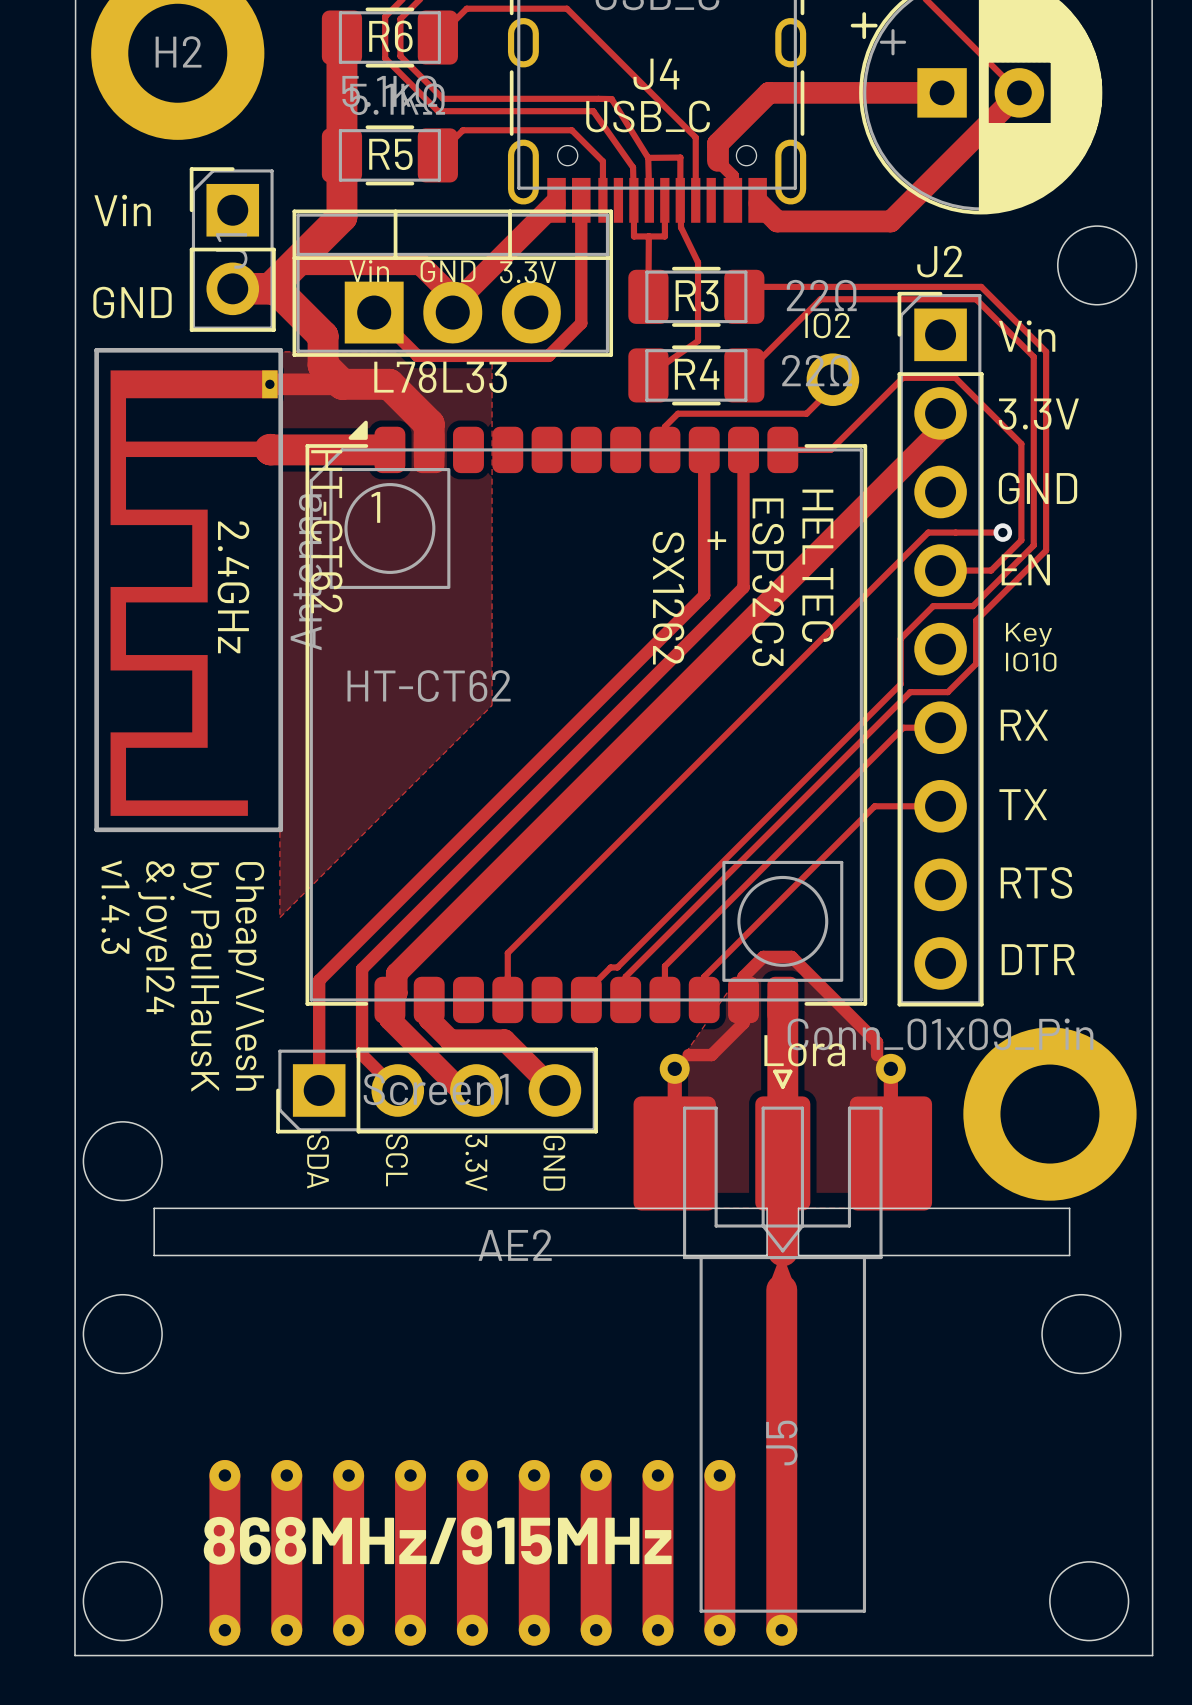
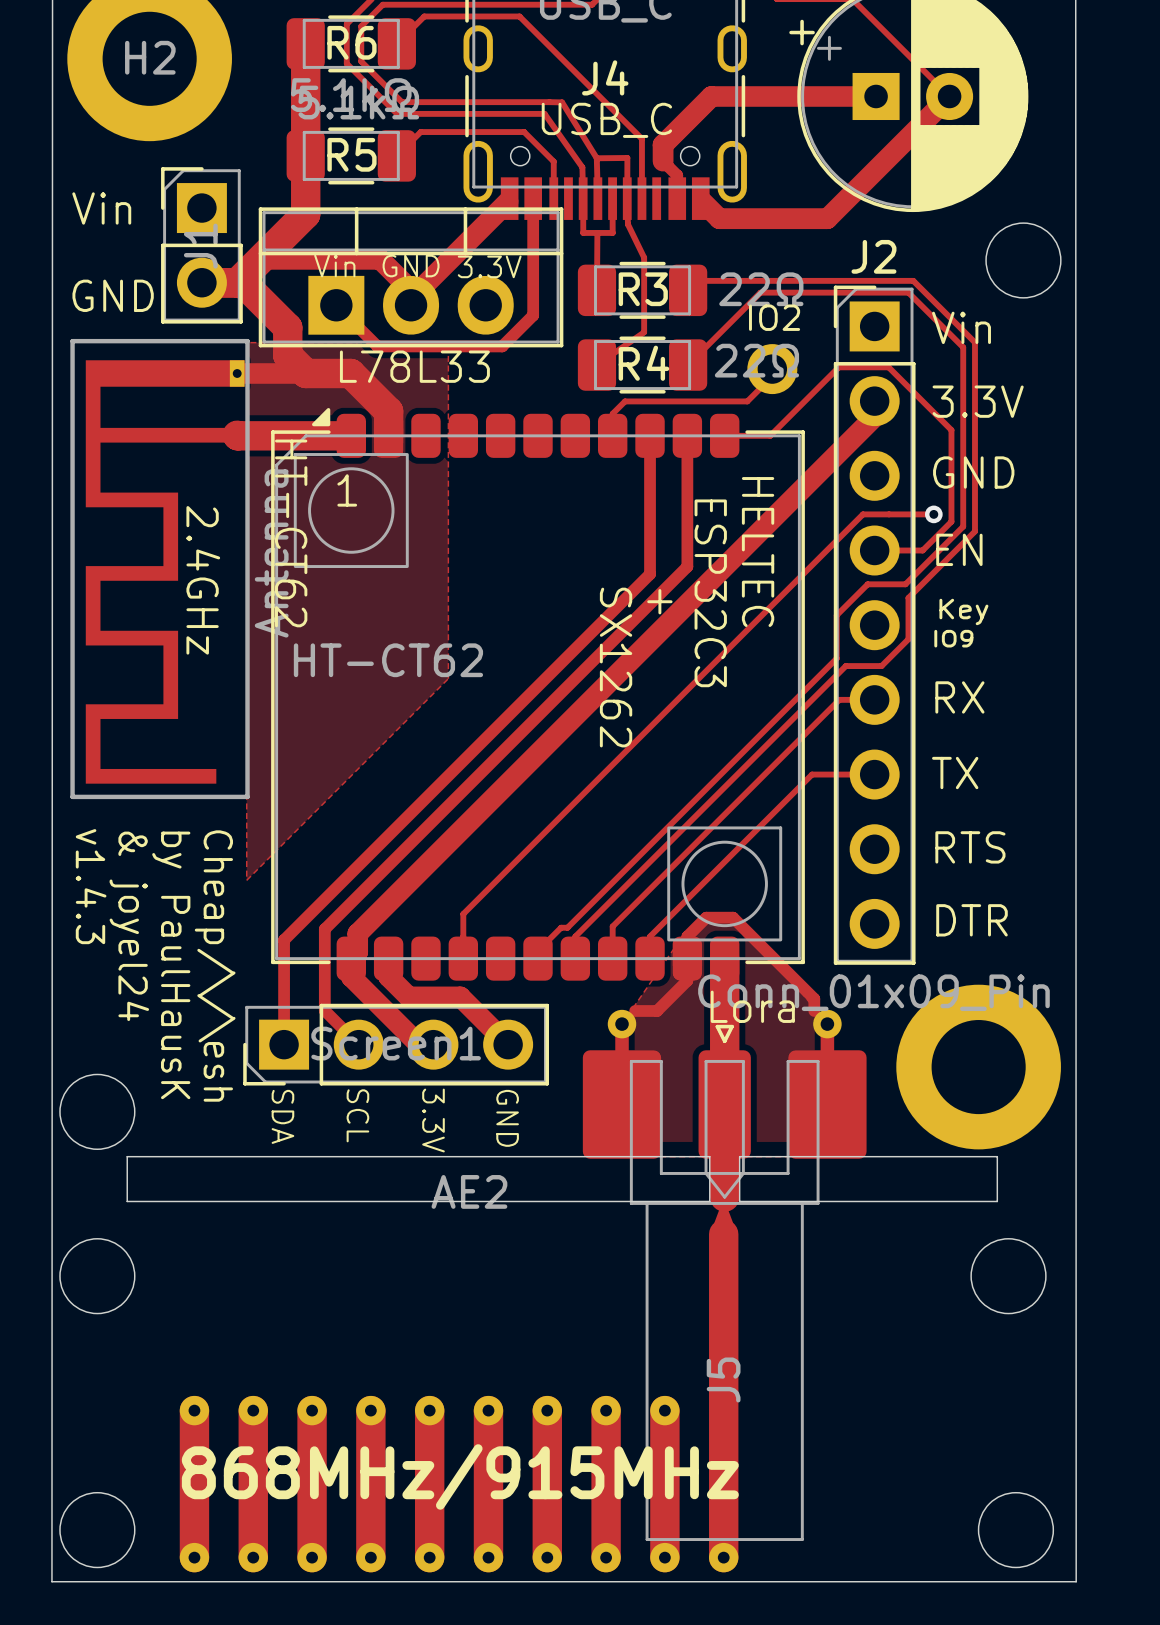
text: IO10 (1031, 662) -> IO9 (953, 638)

